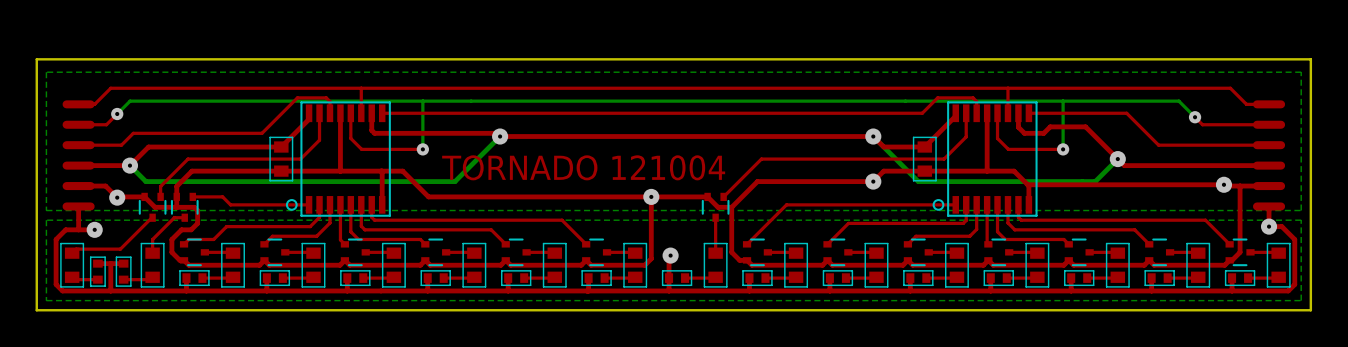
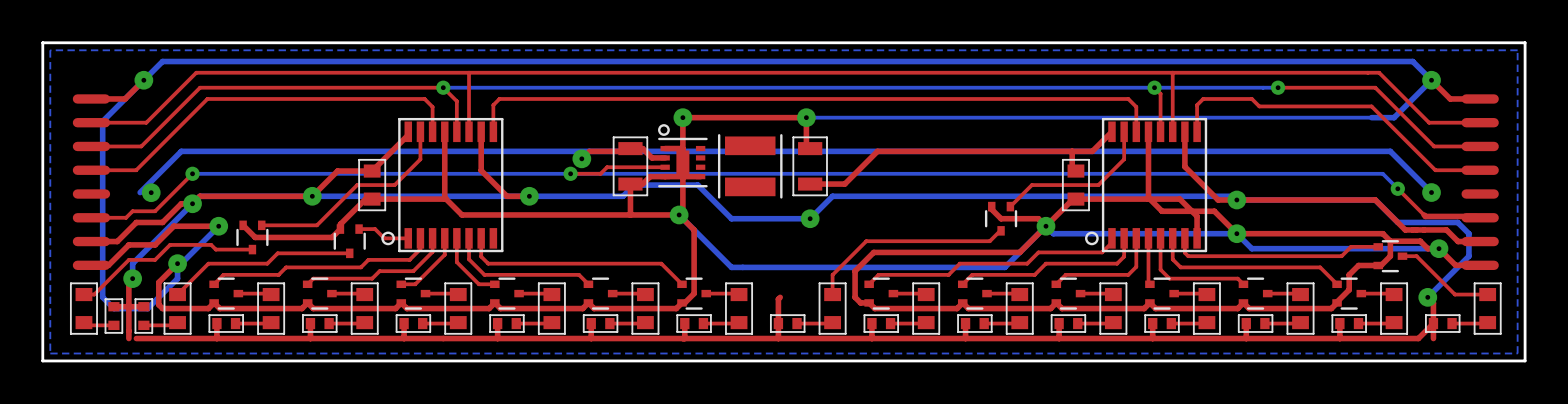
board edge: (36, 59) (1310, 59) -> (42, 69) (42, 42) (1525, 42) (1525, 69)
top track: none -> (469, 72) (469, 131)
top track: none -> (1172, 72) (1172, 102)
top track: none -> (143, 80) (125, 98) (91, 98)
via: none -> (143, 80)
top track: none -> (1431, 80) (1450, 98) (1480, 98)
via: none -> (1431, 80)
bottom zone outline: (46, 72) (46, 210) (1301, 210) (1301, 72) (46, 72) -> (50, 50) (50, 353) (1517, 353) (1517, 50) (50, 50)
bottom track: none -> (443, 87) (1278, 87)
via: none -> (443, 87)
via: none -> (1154, 87)
top track: none -> (1278, 87) (1375, 87) (1434, 146) (1480, 146)
via: none -> (1278, 87)
top track: (361, 88) (361, 113) -> (261, 225) (316, 225) (357, 185) (394, 185) (420, 159) (420, 131)
part footprint: [62, 100, 95, 211] -> [72, 94, 111, 271]
part footprint: [1252, 100, 1286, 211] -> [1461, 94, 1499, 271]
bottom track: (422, 101) (422, 149) -> none
bottom track: (586, 101) (130, 101) (117, 114) -> none
via: none -> (682, 117)
via: none -> (806, 117)
top track: (976, 101) (973, 97) (937, 97) (922, 113) (382, 113) -> (1136, 118) (1136, 106) (1128, 98) (499, 98) (493, 105) (493, 131)
bottom track: (1063, 101) (1063, 149) -> none
bottom track: (1178, 101) (1195, 117) -> (1371, 117) (1394, 117) (1431, 80) (1412, 61) (162, 61) (102, 121) (102, 297) (113, 308) (147, 308) (177, 278) (177, 263) (181, 263) (218, 226)
top track: (78, 104) (94, 104) (110, 88) (1230, 88) (1246, 104) (1269, 104) -> none
top track: none -> (91, 122) (146, 122) (196, 72) (1379, 72) (1429, 122) (1480, 122)
top track: (309, 113) (309, 119) (281, 147) (148, 147) (130, 165) -> none
top track: (319, 113) (319, 140) (300, 159) (188, 159) (160, 186) (160, 196) -> none
top track: (329, 113) (329, 101) (326, 97) (297, 97) (262, 133) (133, 133) (121, 145) (78, 145) -> none
top track: (340, 113) (340, 171) -> none
top track: (350, 113) (350, 138) (361, 149) (422, 149) -> (408, 131) (408, 134) (372, 171) (337, 171) (312, 196) (200, 196) (192, 203) (181, 203) (162, 222) (136, 222) (117, 241) (91, 241)
top track: (371, 113) (371, 130) (374, 133) (496, 133) (500, 136) (873, 136) (883, 147) (924, 147) (955, 116) (955, 113) -> (810, 184) (844, 184) (877, 151) (1092, 151) (1111, 131)
top track: none -> (432, 131) (432, 106) (424, 98) (207, 98) (136, 170) (91, 170)
top track: none -> (456, 131) (456, 101) (443, 87) (200, 87) (141, 146) (91, 146)
top track: none -> (481, 131) (481, 170) (506, 196) (529, 196)
top track: (997, 113) (997, 138) (1008, 149) (1063, 149) -> (1160, 131) (1160, 93) (1154, 87)
top track: (1028, 113) (1126, 113) (1158, 145) (1269, 145) -> (1197, 131) (1197, 105) (1203, 98) (1251, 98) (1259, 106) (1371, 106) (1435, 170) (1480, 170)
top track: (117, 114) (106, 124) (78, 124) -> none
via position: (117, 114) -> (192, 173)
top track: (1195, 117) (1202, 124) (1269, 124) -> none
via position: (1195, 117) -> (1397, 188)
top track: none -> (665, 148) (682, 148)
top track: none -> (810, 148) (806, 144) (806, 117) (682, 117) (682, 211) (679, 214)
top track: (1018, 127) (1024, 133) (1043, 133) (1050, 126) (1085, 126) (1124, 165) (1269, 165) -> (1184, 148) (1184, 166) (1218, 200) (1375, 200) (1405, 229) (1446, 229) (1458, 241) (1480, 241)
top track: none -> (589, 151) (627, 151) (630, 148) (642, 148) (651, 157) (665, 157)
top track: none -> (1072, 151) (1072, 171)
part: none -> (682, 155)
bottom track: (500, 136) (455, 181) (145, 181) (129, 165) -> none
bottom track: (873, 136) (918, 181) (1095, 181) (1117, 159) -> none
via: (873, 136) -> none
part: none -> (630, 166)
part: none -> (750, 166)
part: none -> (810, 166)
top track: none -> (665, 167) (607, 167) (600, 173) (570, 173)
top track: none -> (192, 173) (155, 211) (132, 211) (126, 217) (91, 217)
bottom track: none -> (192, 173) (1382, 173) (1397, 188)
via: (422, 149) -> none
via: none -> (570, 173)
via: (1063, 149) -> none
top track: none -> (700, 176) (650, 176) (642, 184) (630, 184) (630, 214)
part position: (281, 159) -> (372, 185)
part position: (338, 159) -> (442, 185)
top track: (886, 159) (761, 159) (723, 196) -> (1031, 185) (1010, 206)
via: (1117, 159) -> none
top track: (78, 165) (129, 165) -> none
bottom track: none -> (140, 192) (181, 151) (1390, 151) (1431, 192)
via: none -> (1431, 192)
text: TORNADO 121004 (583, 167) -> none
via: none -> (312, 196)
via: none -> (529, 196)
top track: (314, 171) (192, 171) (176, 186) (176, 207) -> (365, 199) (340, 224) (340, 229) (332, 237) (255, 237) (243, 225)
top track: (382, 171) (382, 204) -> (444, 199) (444, 131)
top track: (383, 171) (402, 171) (428, 196) (707, 196) (718, 207) (731, 207) -> (446, 199) (461, 214) (679, 214)
top track: (921, 171) (883, 171) (873, 181) (757, 181) (731, 207) -> (1072, 199) (1019, 252) (873, 252) (855, 271) (855, 297)
top track: none -> (1149, 199) (1162, 211) (1214, 211) (1236, 233) (1382, 233) (1390, 241)
via: none -> (1236, 200)
via: none -> (192, 203)
top track: none -> (991, 206) (991, 209) (1001, 218) (1038, 218) (1045, 226)
via position: (873, 181) -> (1045, 226)
bottom track: none -> (679, 214) (731, 267) (1004, 267) (1045, 226) (1053, 233) (1236, 233) (1251, 248) (1438, 248)
via: none -> (679, 214)
top track: (1027, 184) (1223, 184) -> (1397, 188) (1424, 214)
via: (1223, 184) -> none
top track: (78, 186) (105, 186) (117, 197) (144, 196) (155, 207) (194, 207) (197, 210) (197, 223) (191, 229) (181, 229) (171, 239) (171, 252) (179, 260) (184, 260) -> (177, 263) (158, 282) (158, 304) (162, 308) (208, 308) (214, 302)
top track: (1240, 186) (1240, 252) (1232, 260) (1224, 265) (1154, 265) (1149, 260) -> (1390, 241) (1390, 256) (1381, 265) (1358, 265) (1349, 274) (1349, 289) (1337, 302)
via: none -> (810, 218)
top track: none -> (218, 226) (173, 226) (155, 244) (128, 244) (108, 265) (91, 265)
via: none -> (218, 226)
top track: (192, 196) (222, 196) (230, 204) (309, 204) -> none
top track: none -> (359, 229) (375, 229) (384, 238) (408, 238)
top track: (651, 196) (651, 258) (644, 265) (591, 265) (586, 260) -> (679, 214) (694, 229) (694, 293) (684, 302) (681, 302)
via: (651, 196) -> none
via: (117, 197) -> none
via: none -> (1236, 233)
part: none -> (252, 237)
top track: (319, 204) (319, 217) (310, 226) (229, 226) -> (349, 253) (277, 253) (267, 263)
top track: (329, 204) (329, 222) (316, 236) (272, 236) (269, 239) -> (432, 238) (432, 251) (413, 271) (379, 271) (372, 278) (313, 278)
top track: (340, 204) (340, 239) (344, 244) -> (444, 238) (444, 254) (415, 284) (401, 284)
top track: (350, 204) (350, 231) (358, 239) (420, 239) (425, 244) -> (456, 238) (456, 262) (478, 284) (494, 284)
top track: (361, 204) (361, 226) (364, 229) (491, 229) (497, 236) -> (469, 238) (469, 259) (484, 274) (579, 274)
top track: none -> (420, 238) (420, 249) (409, 259) (368, 259) (360, 267) (286, 267) (278, 274) (223, 274) (219, 278)
top track: (371, 204) (371, 217) (374, 220) (562, 220) (568, 226) -> (481, 238) (481, 256) (488, 263) (661, 263)
top track: (955, 204) (786, 204) (755, 236) -> (1111, 238) (1111, 242) (1102, 252) (1038, 252) (1027, 263) (959, 263) (948, 274) (878, 274)
top track: (78, 206) (78, 229) -> none
top track: (1269, 206) (1269, 226) (1281, 226) (1294, 239) (1294, 284) (1288, 290) (1219, 290) -> (1427, 297) (1433, 303) (1433, 323) (1418, 338)
part: (152, 207) -> none
part: (184, 207) -> none
part: none -> (349, 241)
part position: (715, 207) -> (1001, 218)
top track: (731, 207) (731, 252) (734, 255) -> none
top track: none -> (1390, 241) (1420, 241) (1427, 248) (1438, 248) (1455, 265) (1480, 265)
via: none -> (1438, 248)
top track: (152, 217) (120, 249) (76, 249) (72, 253) -> (252, 249) (215, 249) (211, 244) (170, 244) (155, 259) (128, 259) (94, 294) (83, 294)
top track: (184, 217) (174, 217) (152, 239) (152, 253) -> none
top track: (715, 217) (715, 236) -> (1001, 230) (989, 241) (866, 241) (832, 274)
bottom zone outline: (46, 220) (1301, 220) (1301, 300) (46, 300) (46, 220) -> none
top track: (1153, 220) (1205, 220) (1229, 244) -> (1341, 256) (1351, 246) (1378, 246)
top track: (963, 223) (848, 223) (835, 236) -> (1120, 259) (1117, 263) (1045, 263) (1034, 274) (972, 274)
via: none -> (177, 263)
top track: (226, 226) (213, 239) (188, 239) -> (263, 263) (208, 263) (177, 294)
via: (1269, 226) -> none
top track: (94, 229) (65, 229) (56, 239) (56, 284) (62, 290) (117, 290) -> none
via: (94, 229) -> none
top track: none -> (132, 278) (128, 282) (128, 306)
bottom track: none -> (132, 278) (132, 263) (200, 196) (622, 196) (634, 185) (697, 185) (731, 218) (810, 218) (832, 196) (1233, 196) (1236, 200) (1375, 200) (1397, 222) (1457, 222) (1468, 233) (1468, 256) (1427, 297)
via: none -> (132, 278)
part position: (1240, 252) -> (1390, 256)
top track: (1250, 252) (1278, 253) -> (1402, 256) (1416, 256) (1454, 294) (1487, 294)
via: (670, 255) -> none
via: none -> (1427, 297)

